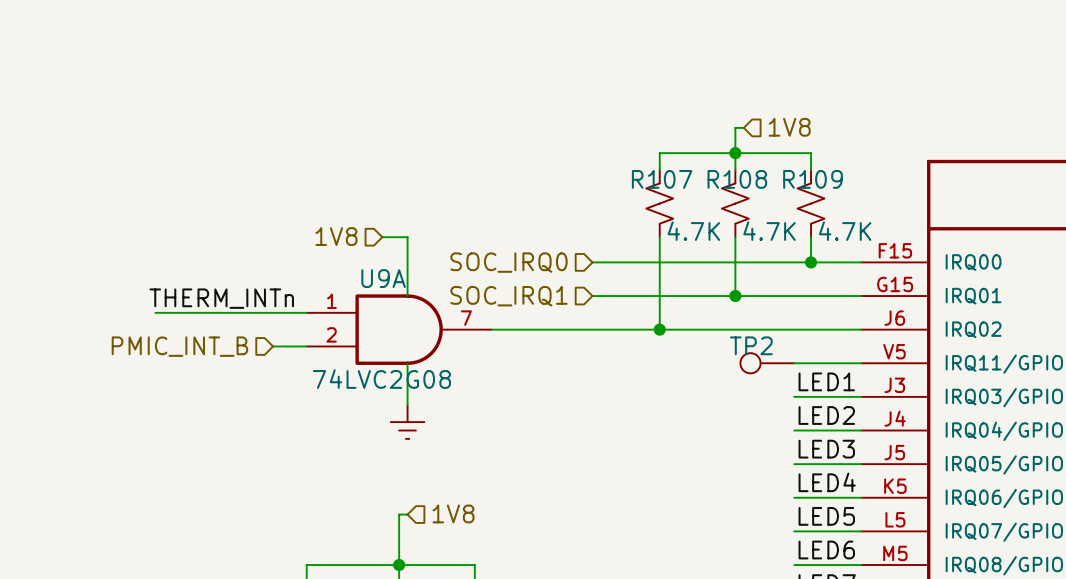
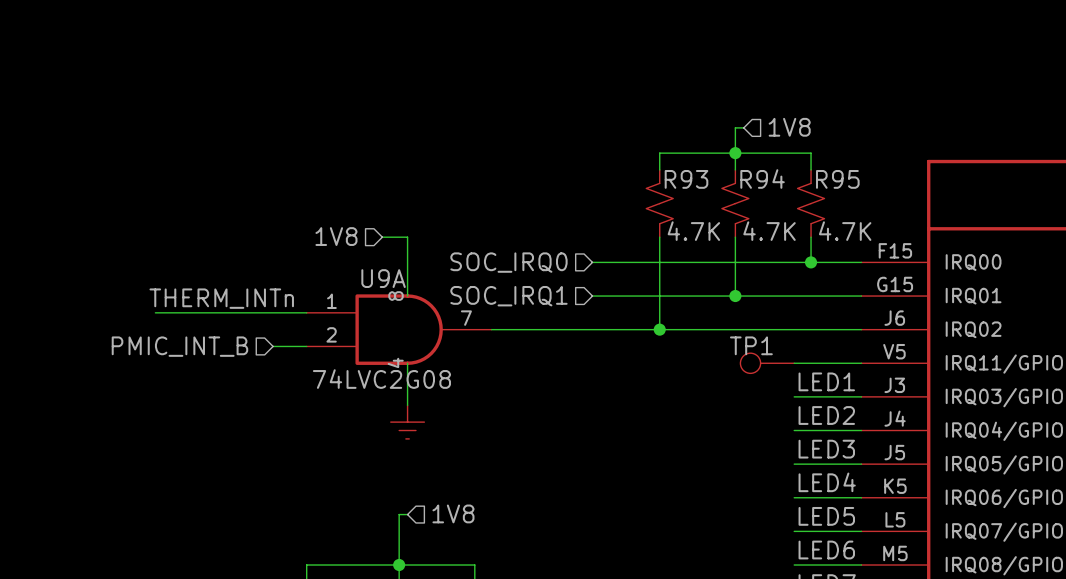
R107 name: R107 (662, 179) -> R93 (686, 179)
R108 name: R108 (737, 179) -> R94 (762, 179)
R109 name: R109 (812, 179) -> R95 (837, 179)
U9A pin number: none -> 8 (396, 296)
TP2 name: TP2 (751, 345) -> TP1 (751, 345)
U9A pin number: none -> 4 (395, 362)

